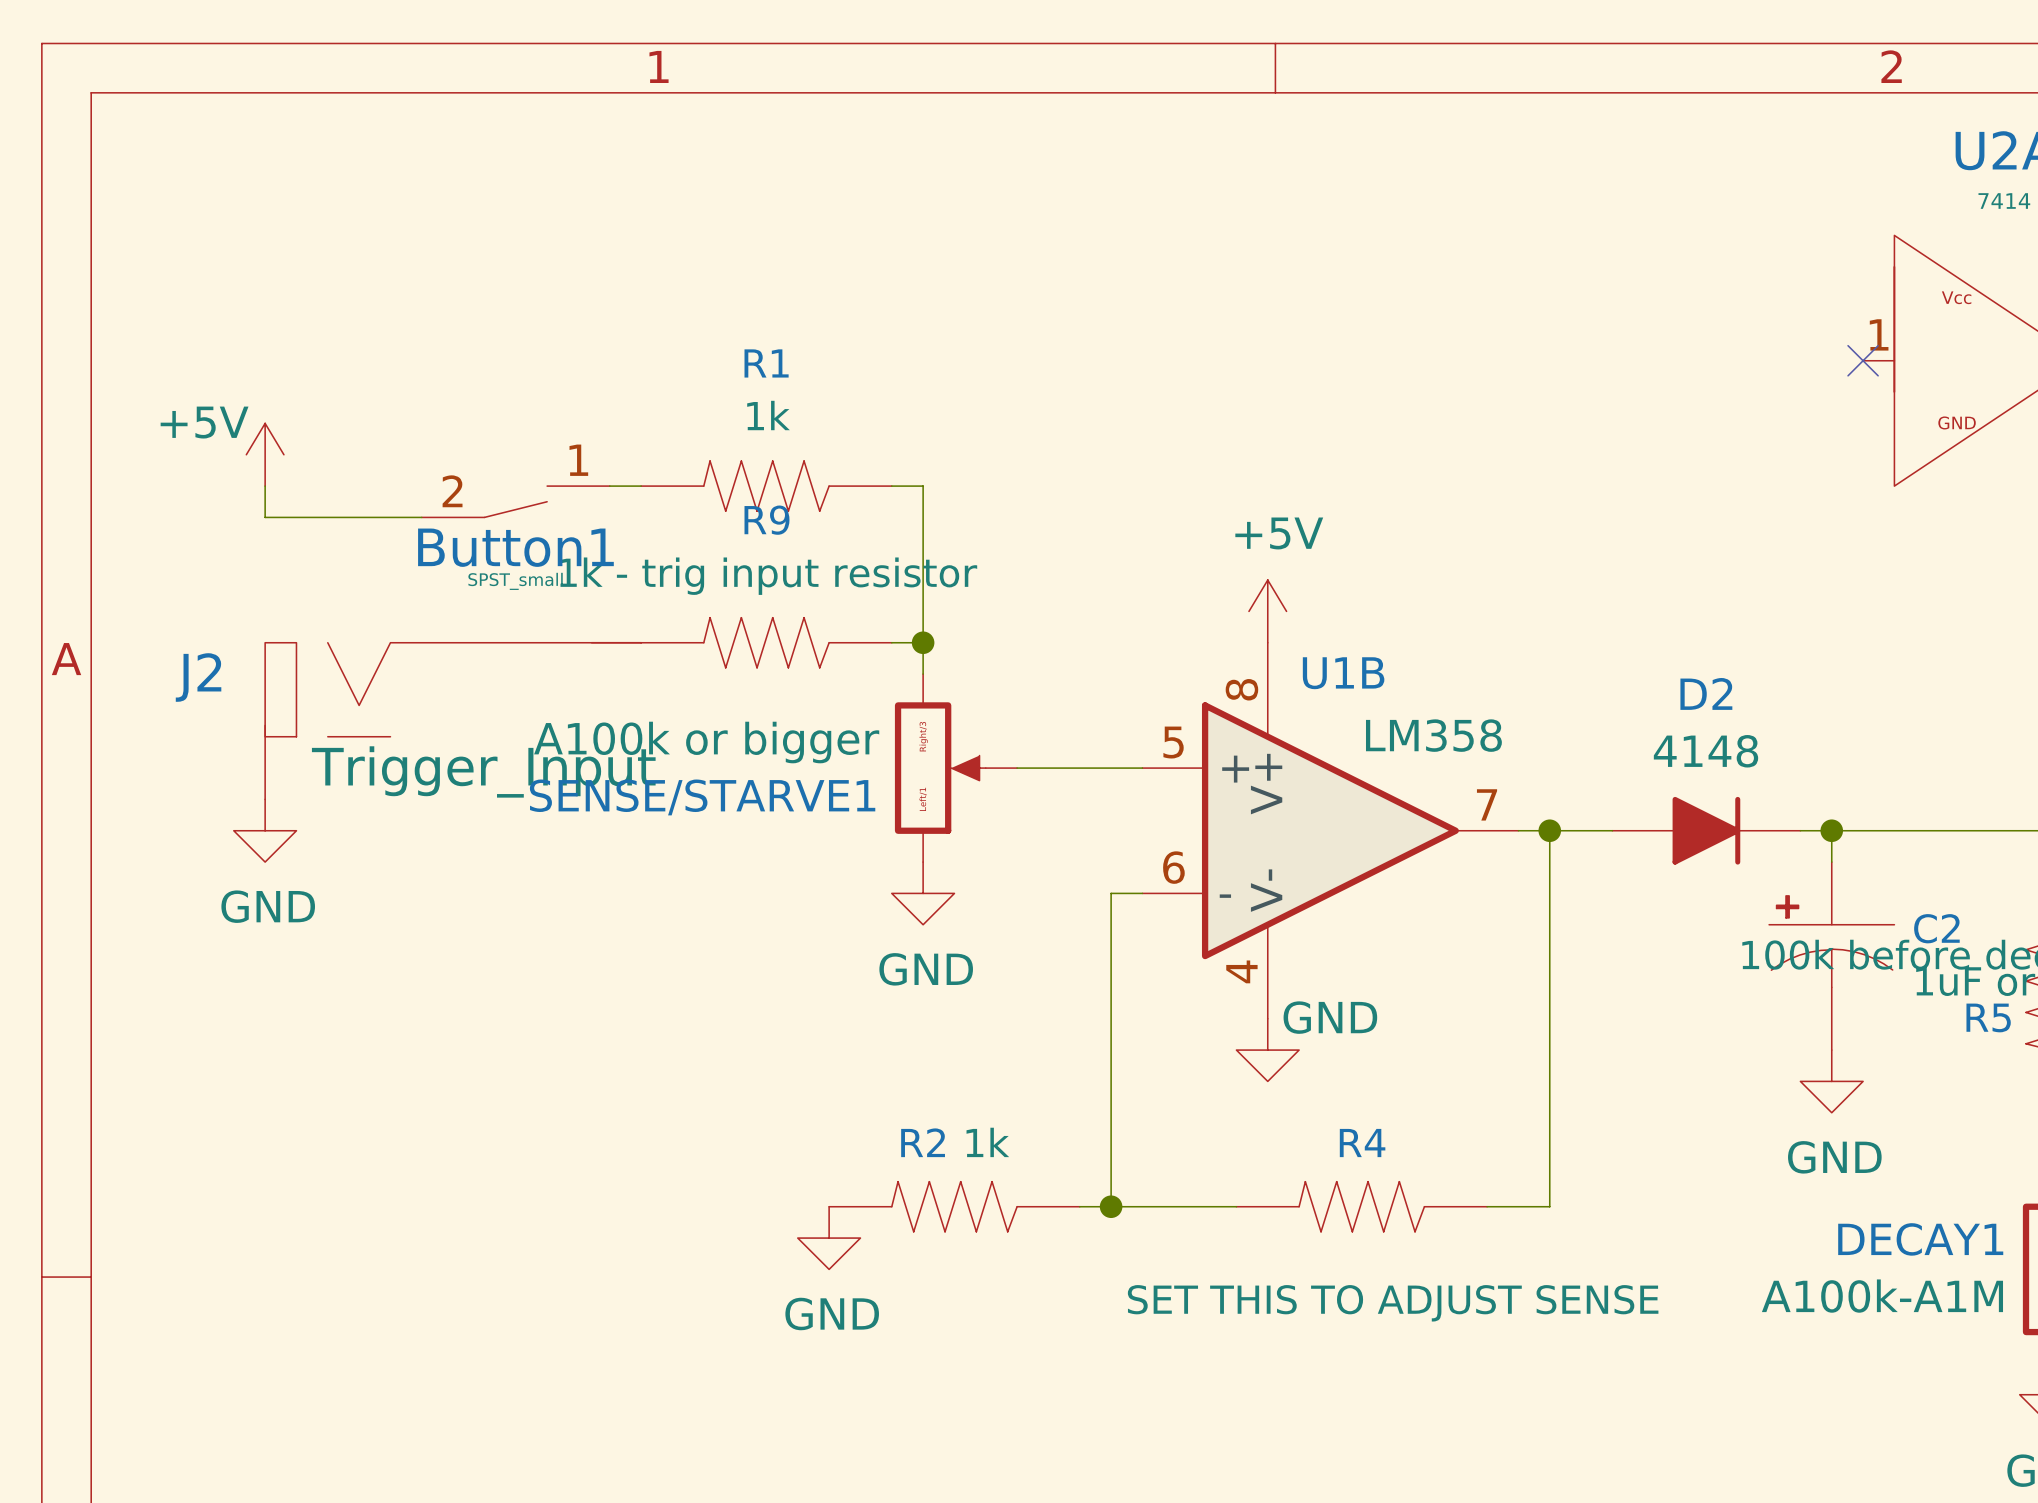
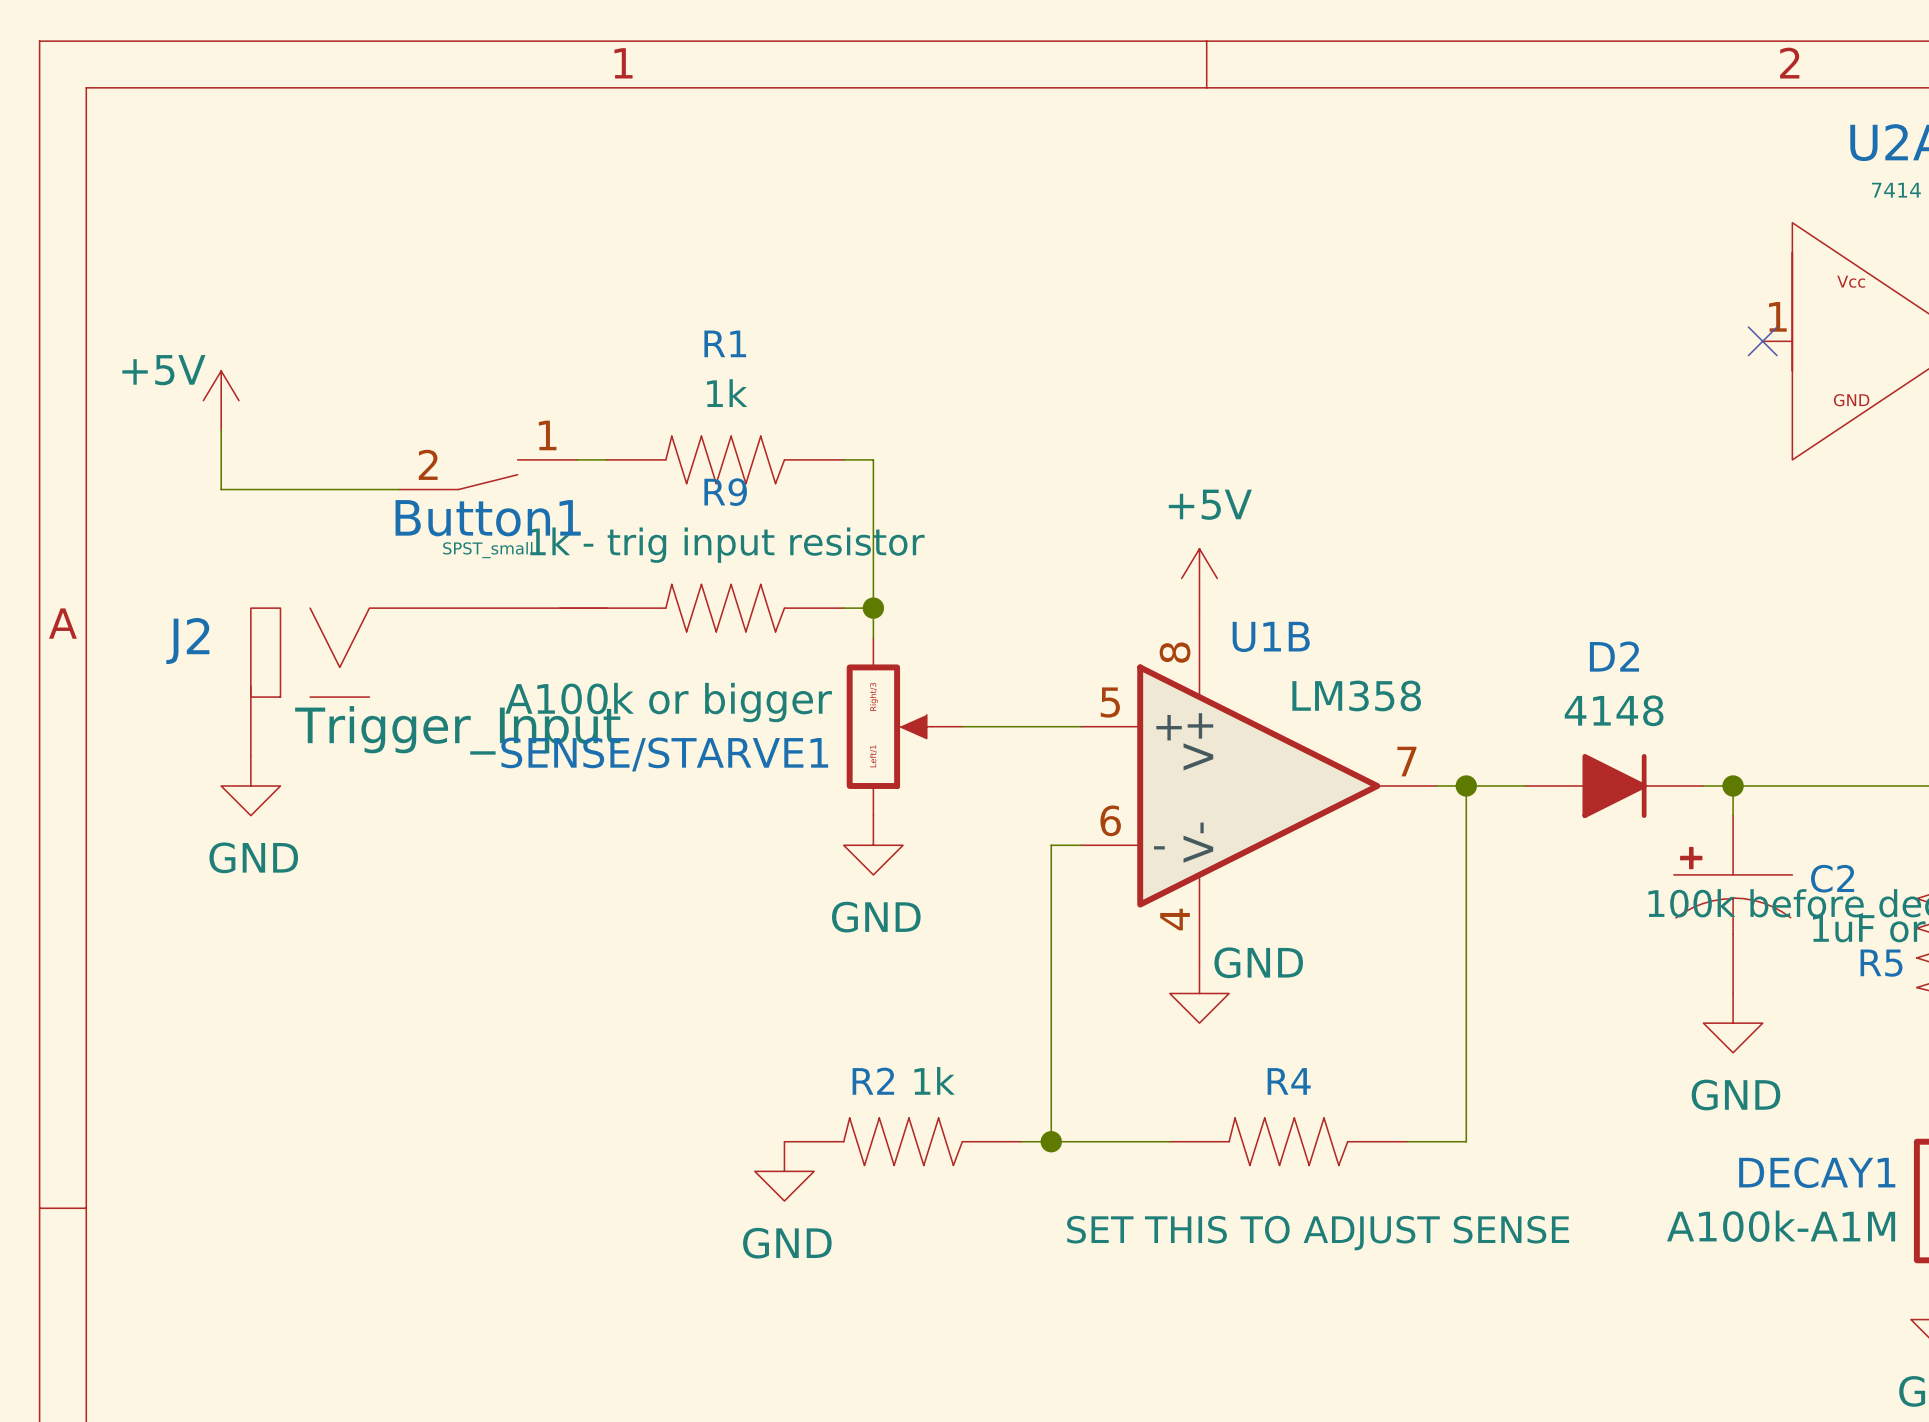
power symbol position: +5V (265, 454) -> +5V (221, 400)
wire: (265, 486) (265, 517) -> (221, 430) (221, 489) (250, 489)

